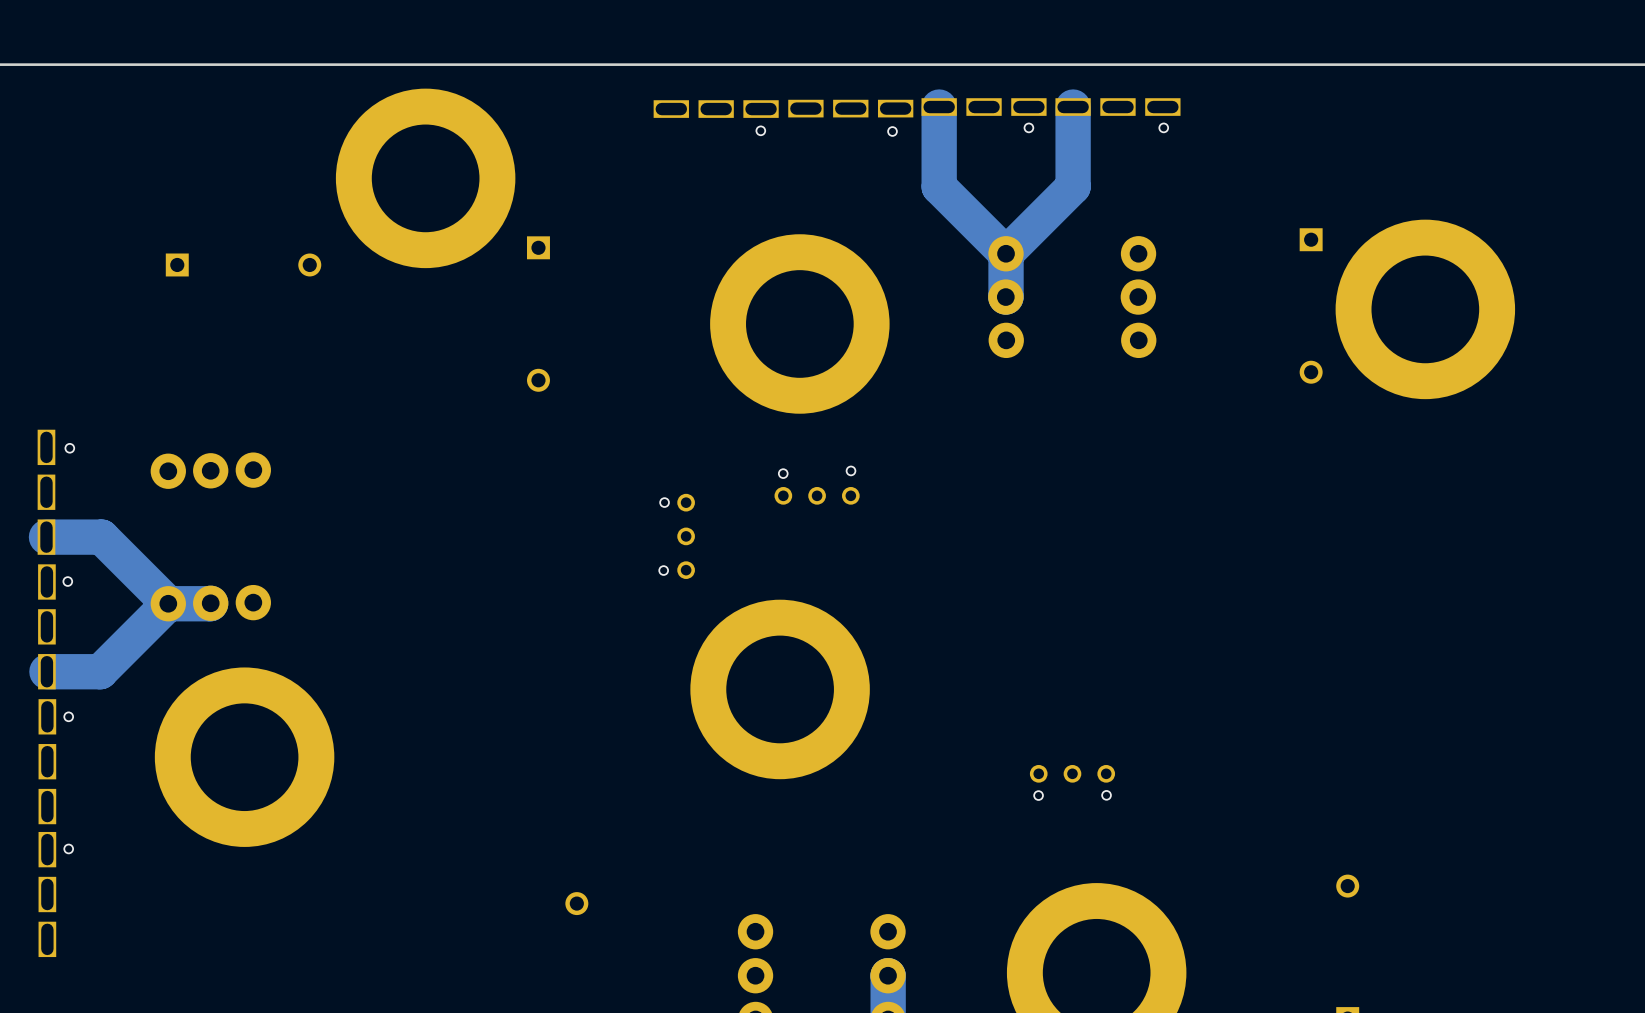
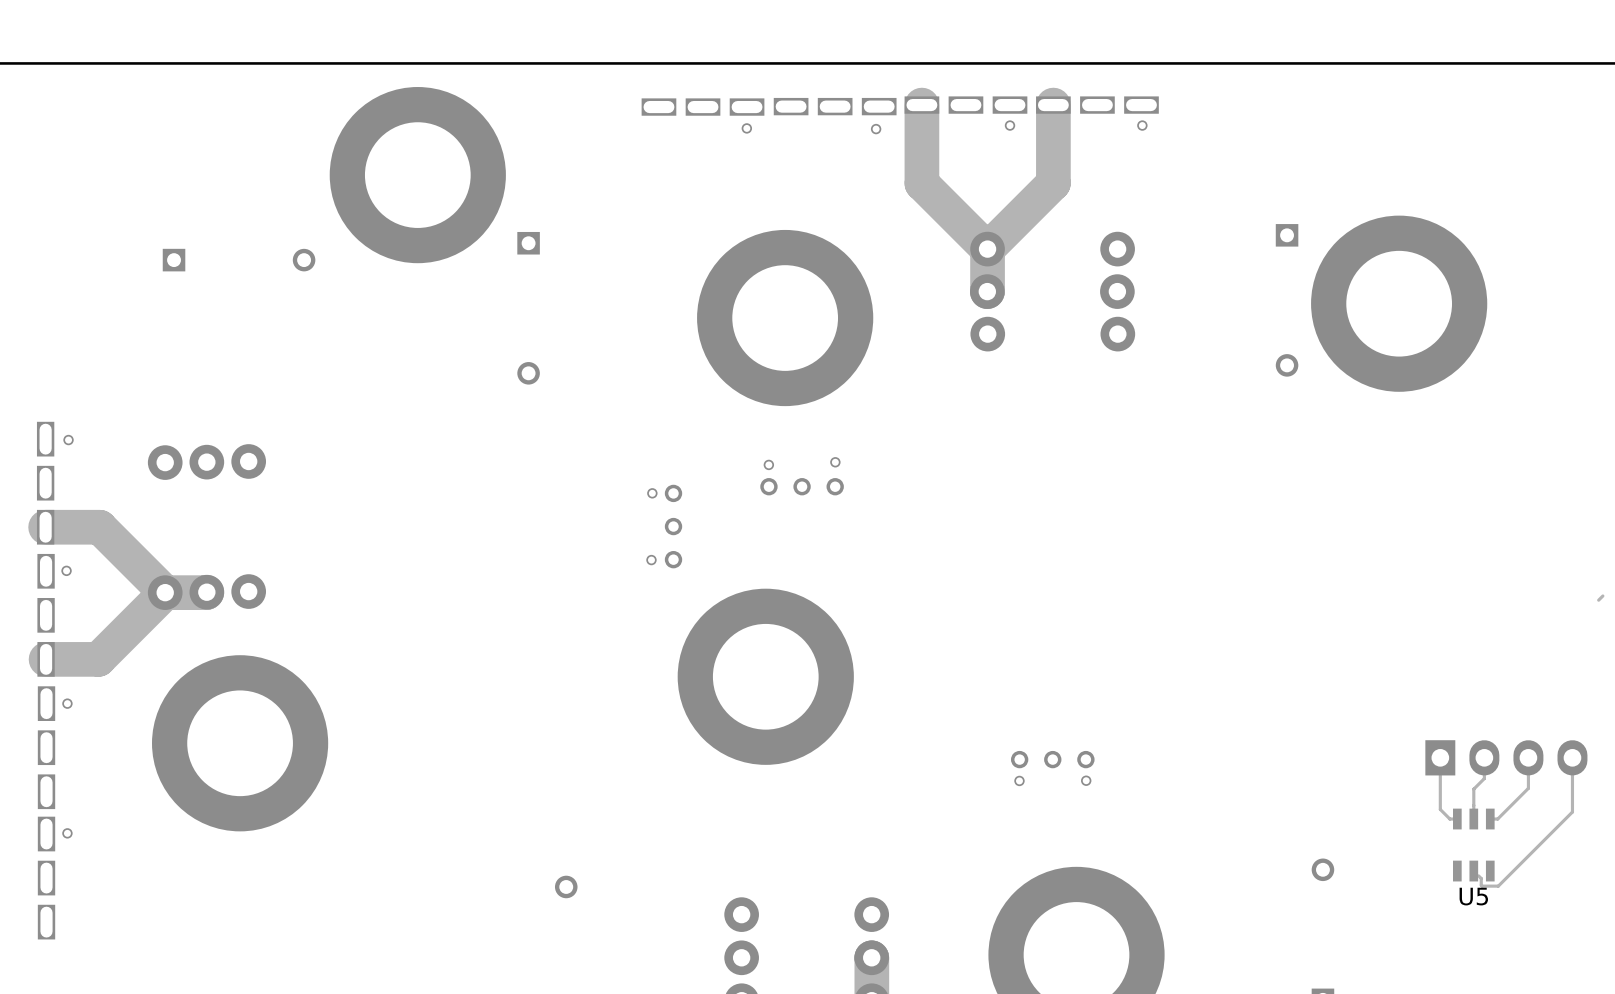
track: none -> (1602, 595) (1598, 600)
track: none -> (1440, 757) (1440, 809) (1449, 819) (1457, 819) (1457, 825)
track: none -> (1484, 757) (1484, 778) (1473, 789) (1473, 819)
part: none -> (1506, 757)
track: none -> (1528, 757) (1528, 788) (1497, 819) (1490, 819)
track: none -> (1572, 757) (1572, 812) (1498, 886) (1482, 886) (1481, 878) (1478, 875)
U5: none -> (1473, 845)

